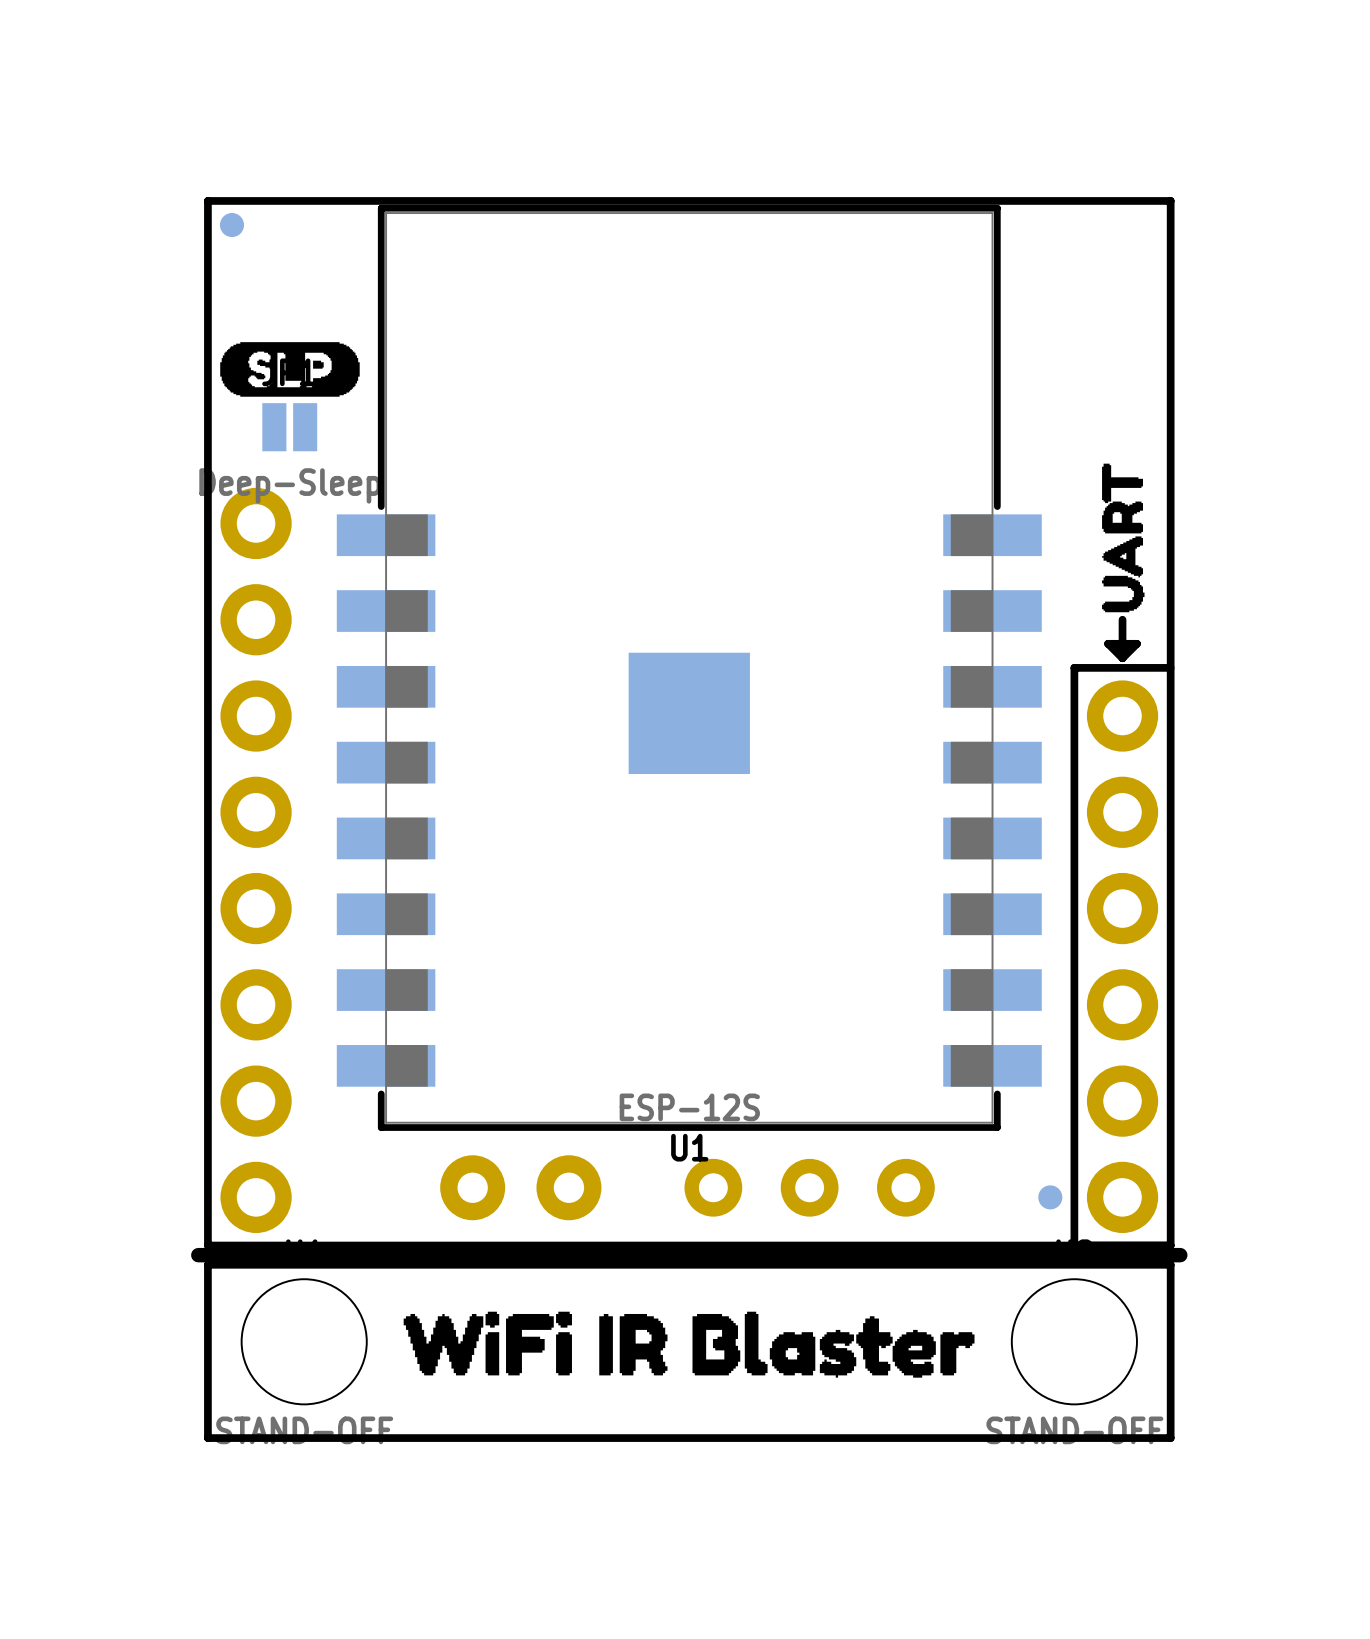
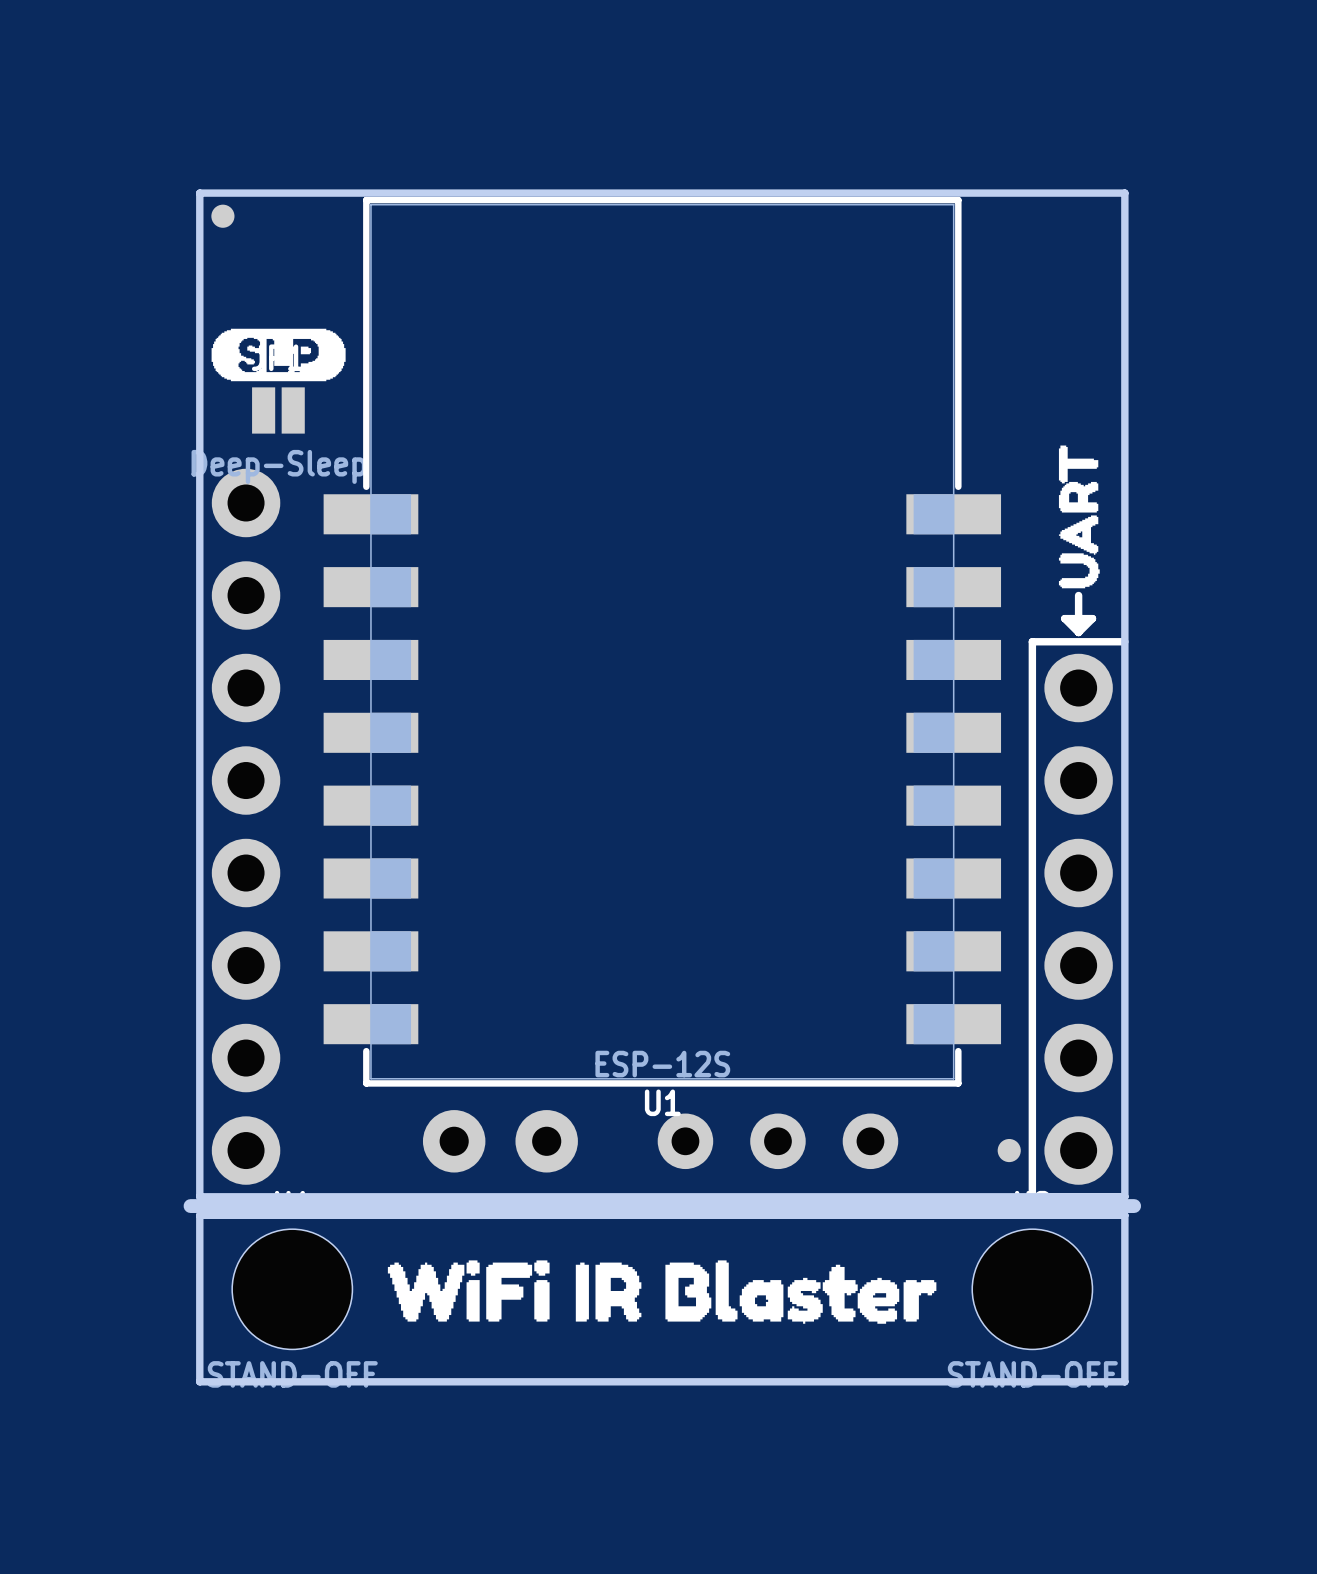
U1 footprint: [336, 204, 1042, 1131] -> [323, 196, 1002, 1087]

